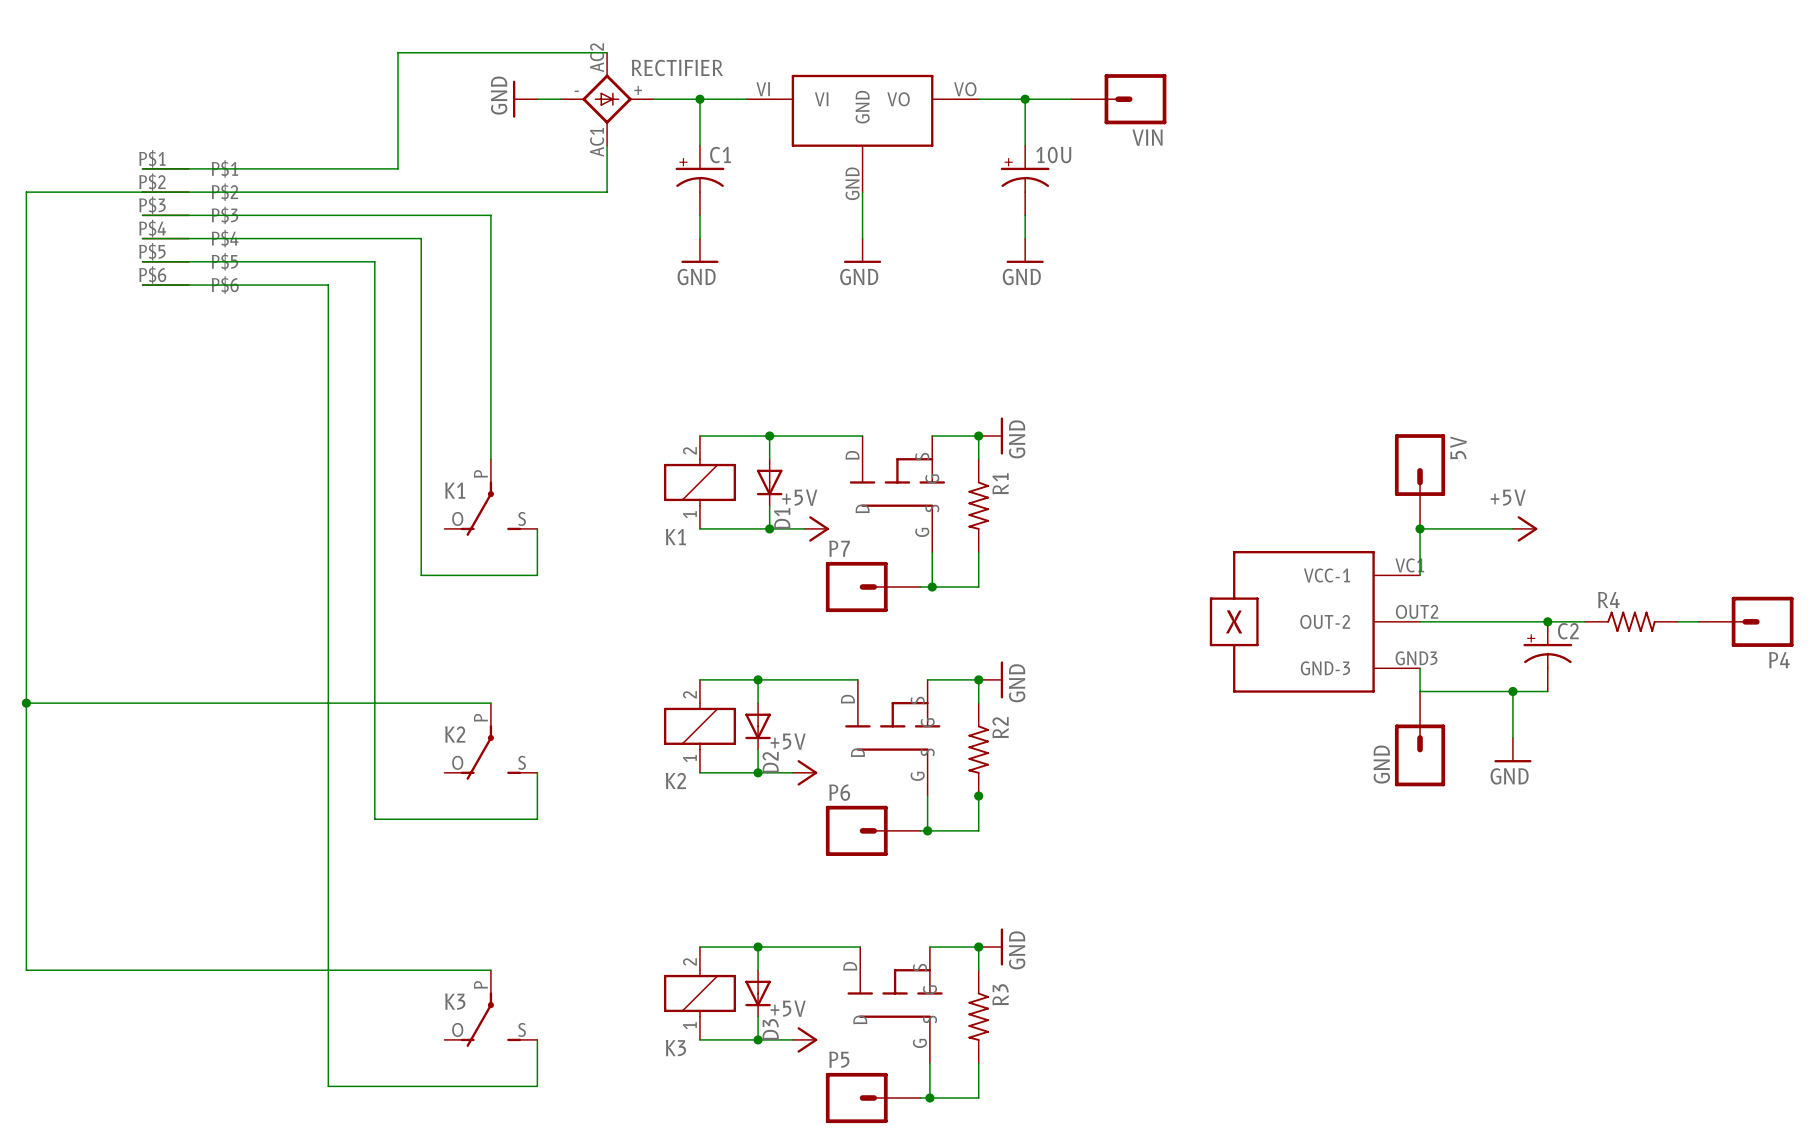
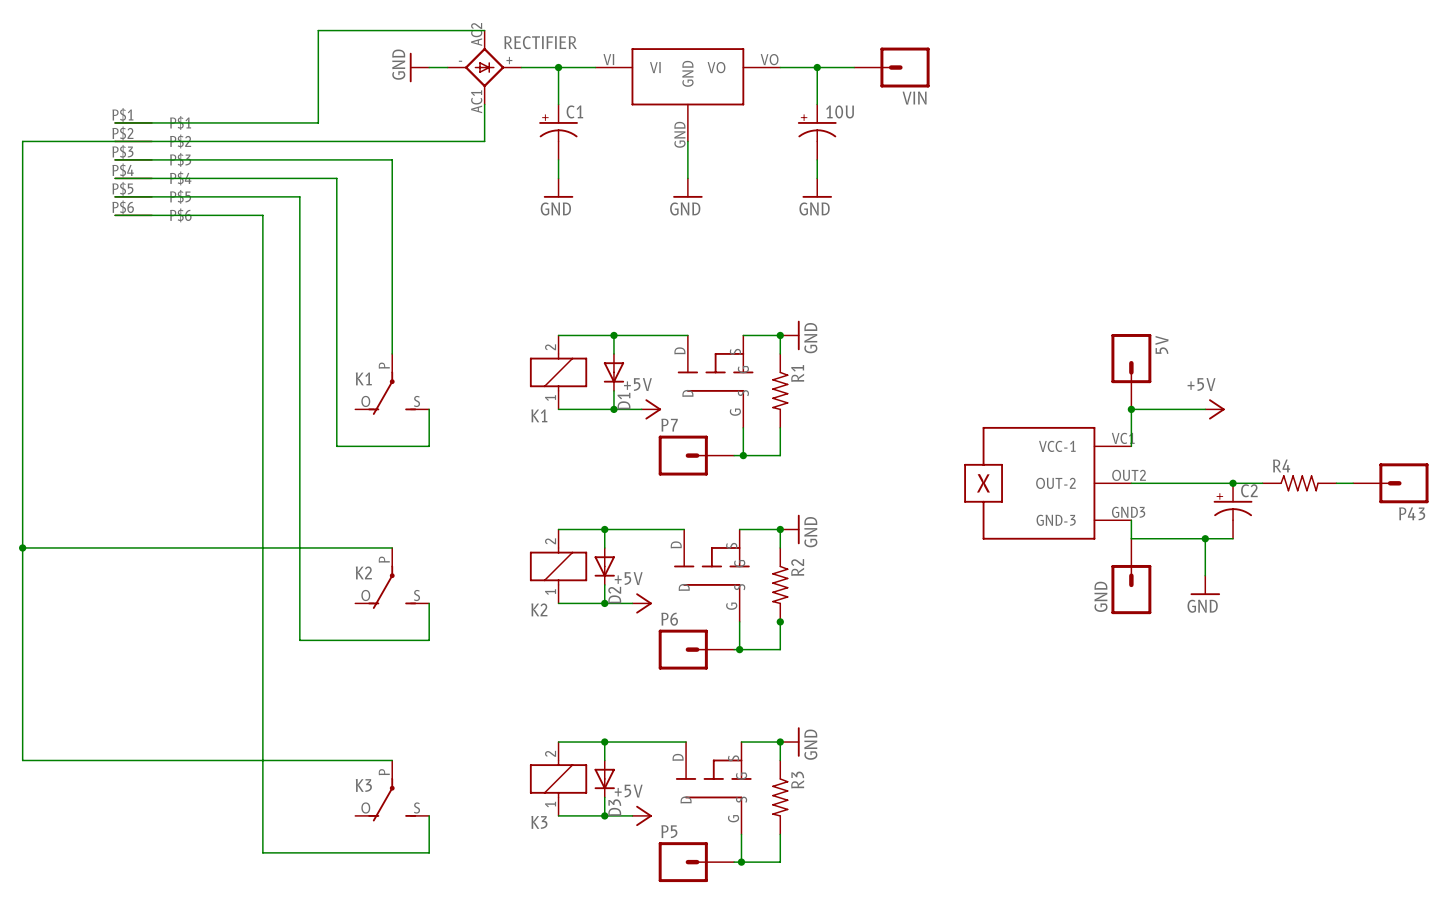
P4 name: P4 (1779, 660) -> P43 (1412, 513)

